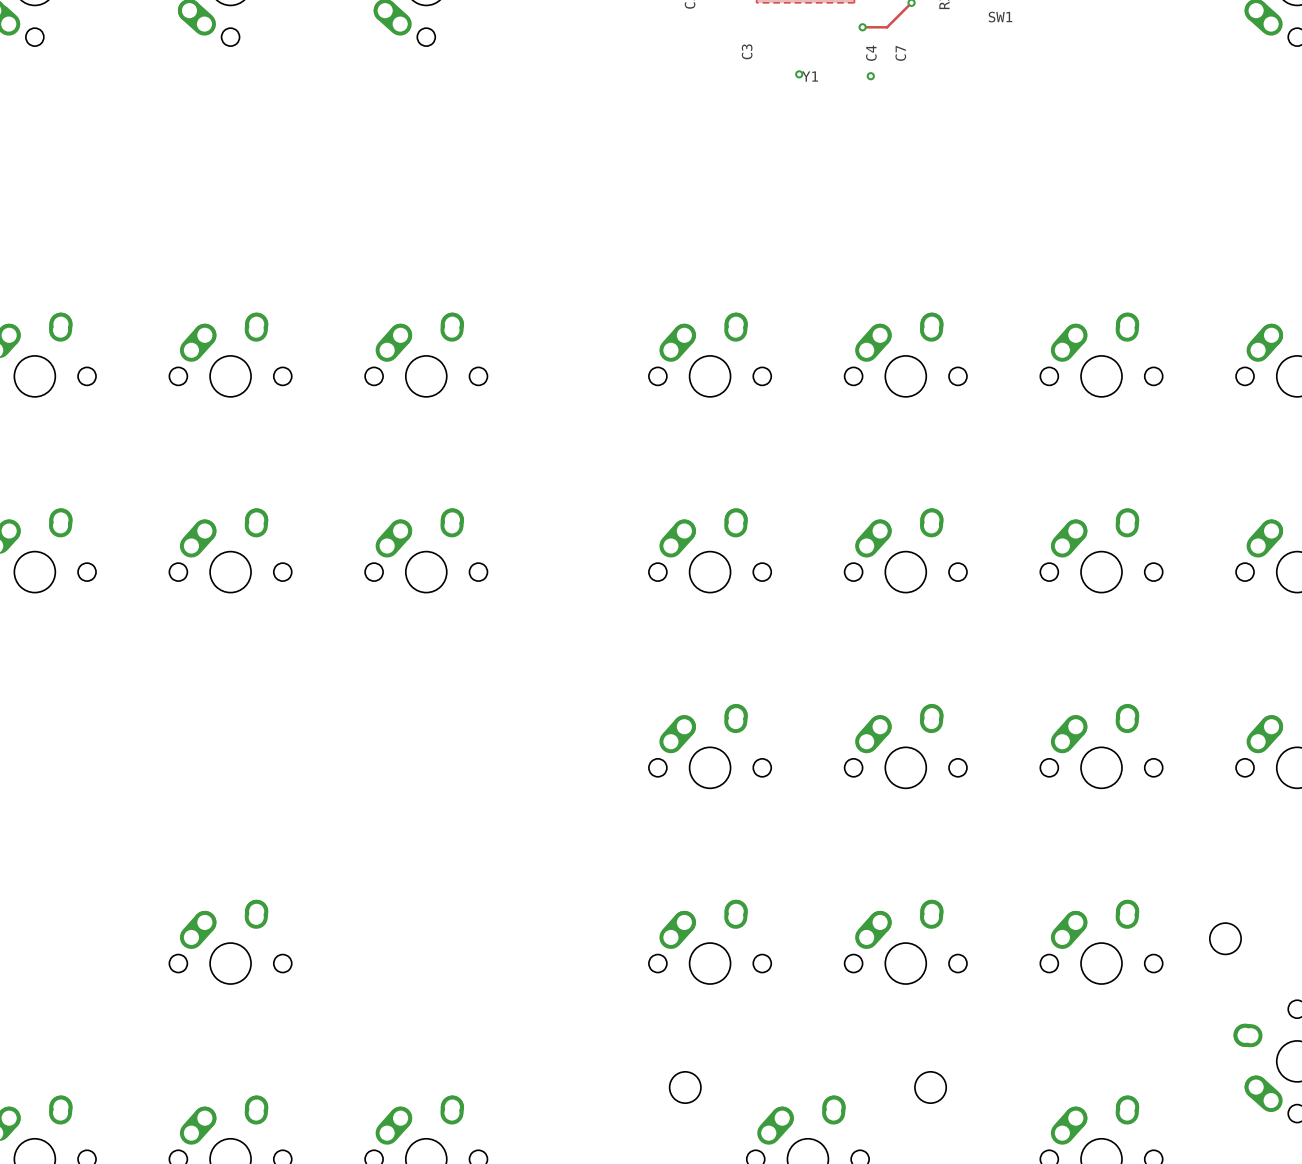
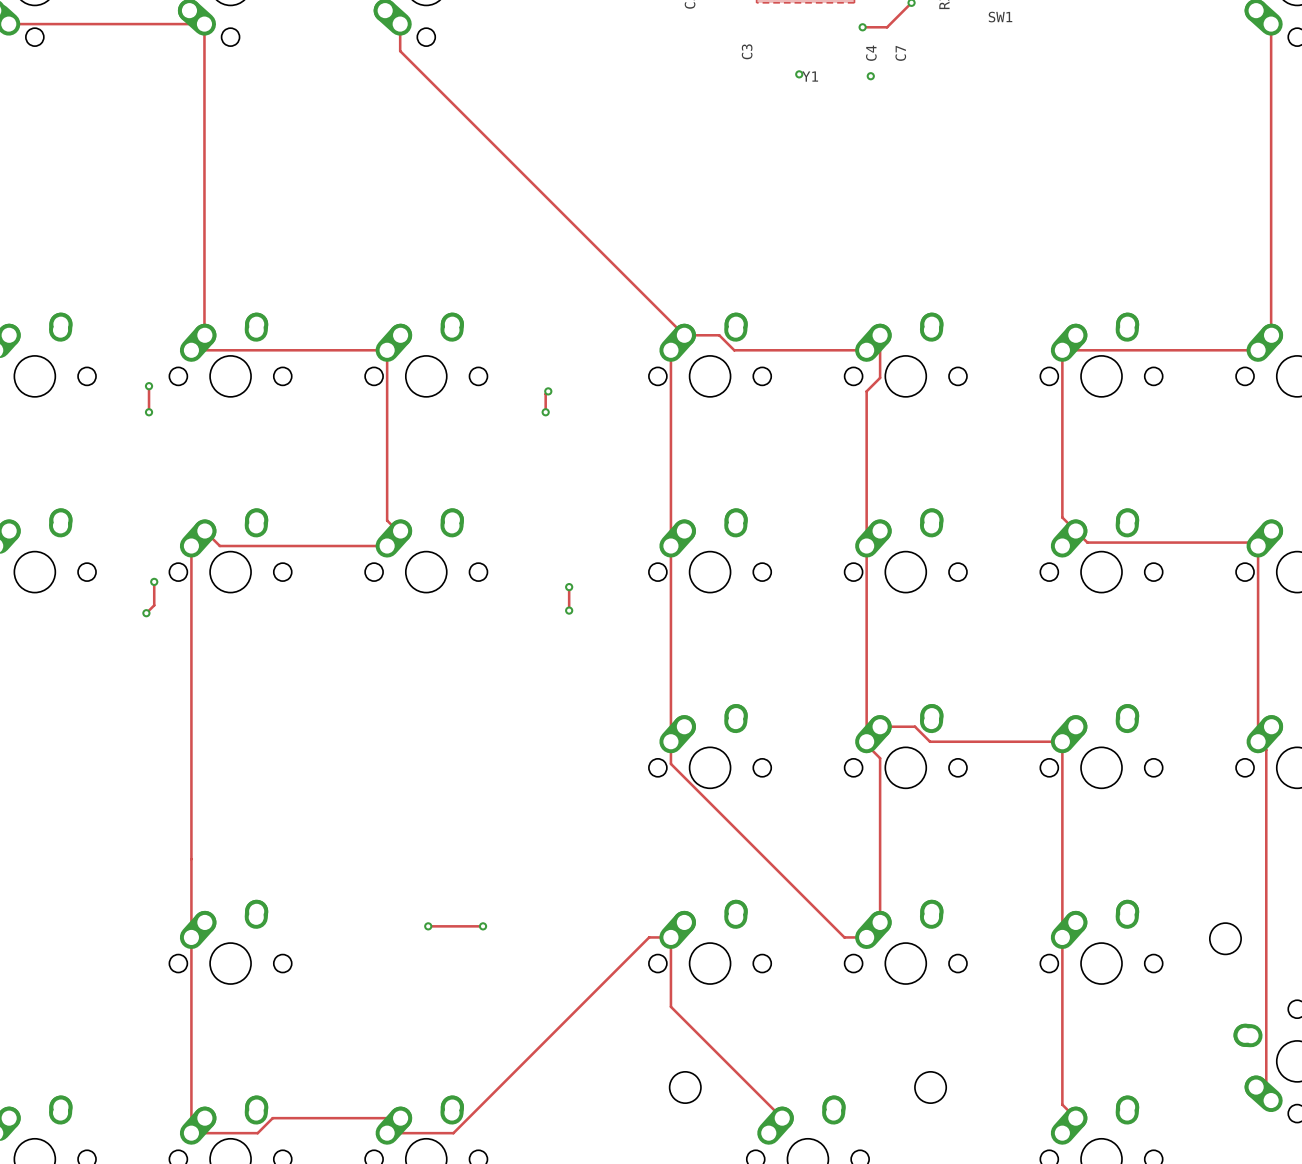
track: none -> (8, 24) (204, 24) (204, 335)
track: none -> (400, 24) (400, 51) (684, 335) (719, 335) (734, 350) (866, 350)
track: none -> (1271, 24) (1271, 337) (1258, 350) (1062, 350) (1062, 517) (1087, 542) (1254, 542) (1258, 546) (1258, 741) (1266, 749) (1266, 1095) (1271, 1100)
track: none -> (400, 335) (385, 350) (191, 350)
track: none -> (880, 335) (880, 377) (866, 391) (866, 744) (880, 758) (880, 922)
track: none -> (387, 350) (387, 520) (397, 531) (400, 531)
track: none -> (670, 350) (670, 763) (844, 937) (866, 937)
track: none -> (149, 386) (149, 412)
via: none -> (149, 386)
track: none -> (548, 391) (545, 394) (545, 412)
via: none -> (548, 391)
via: none -> (149, 412)
via: none -> (545, 412)
track: none -> (204, 531) (219, 546) (387, 546)
track: none -> (191, 546) (191, 1133) (257, 1133) (272, 1118) (400, 1118)
track: none -> (154, 581) (154, 605) (146, 613)
via: none -> (154, 581)
track: none -> (569, 587) (569, 610)
via: none -> (569, 587)
via: none -> (569, 610)
via: none -> (146, 613)
track: none -> (880, 726) (915, 726) (930, 741) (1062, 741) (1062, 1104) (1075, 1118)
track: none -> (428, 926) (483, 926)
via: none -> (428, 926)
via: none -> (483, 926)
track: none -> (782, 1118) (670, 1006) (670, 937) (649, 937) (453, 1133) (387, 1133)

